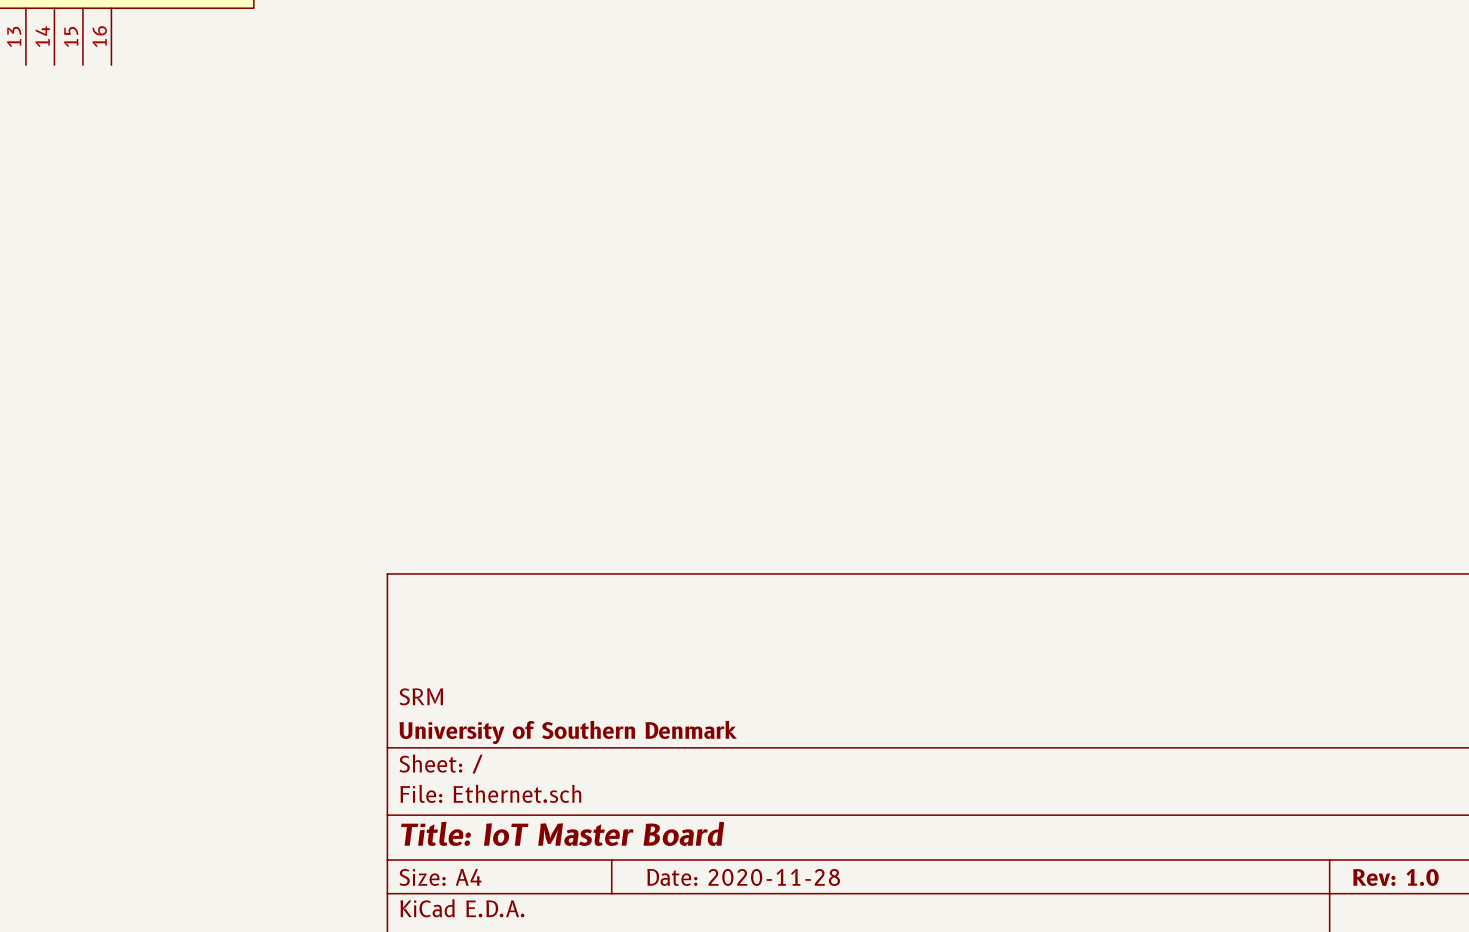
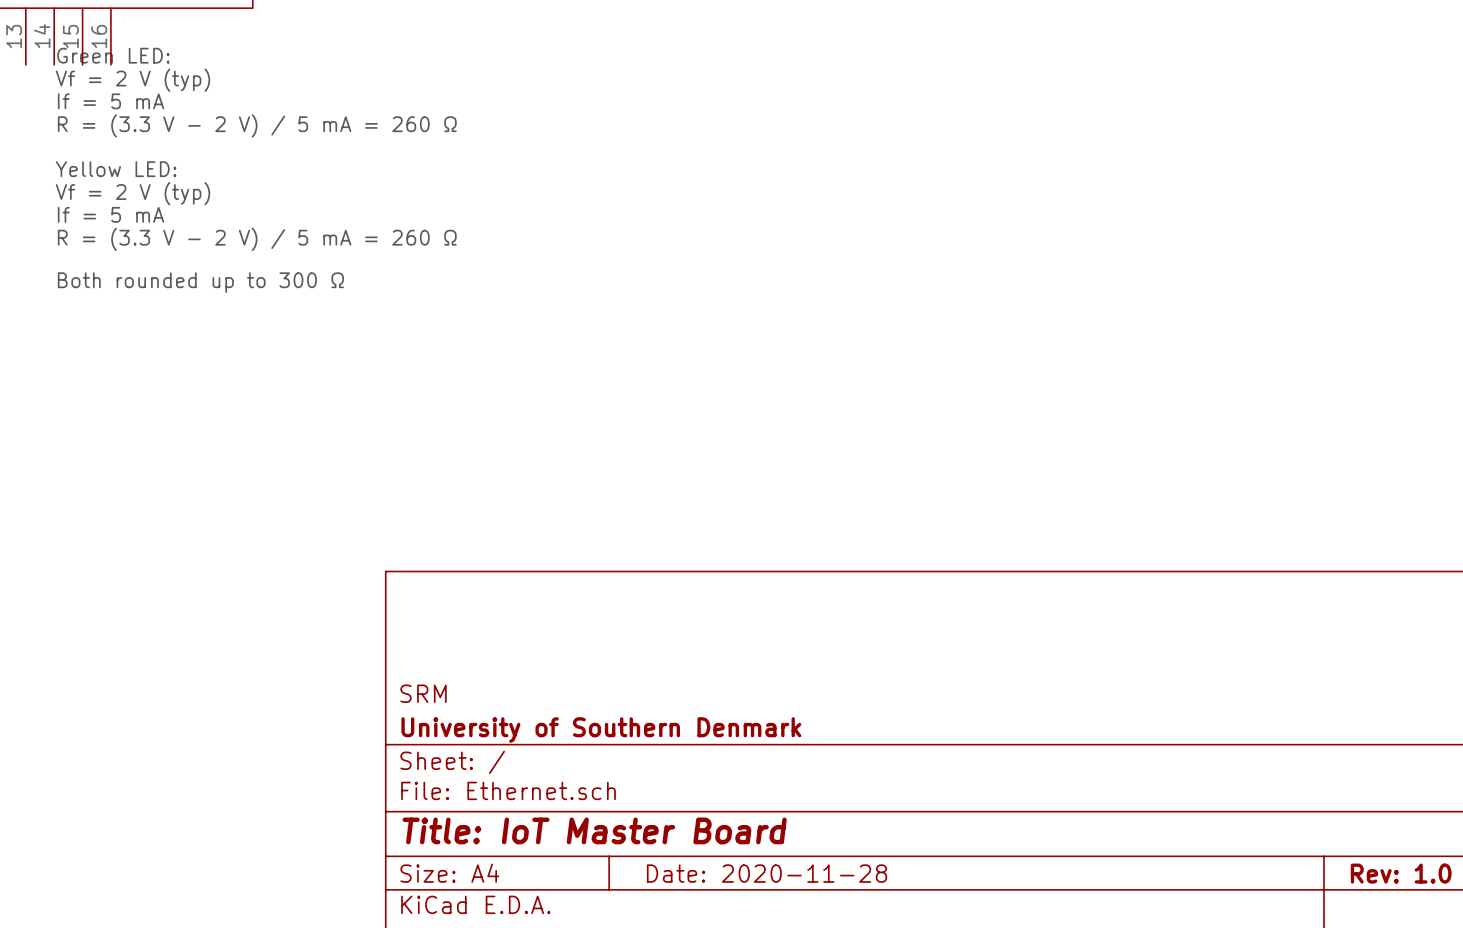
text: none -> Green LED: (113, 55)
text: none -> Vf = 2 V (typ) (132, 80)
text: none -> If = 5 mA (111, 101)
text: none -> R = (3.3 V - 2 V) / 5 mA = 260 Ω (257, 125)
text: none -> Yellow LED: (116, 169)
text: none -> Vf = 2 V (typ) (132, 193)
text: none -> If = 5 mA (111, 214)
text: none -> R = (3.3 V - 2 V) / 5 mA = 260 Ω (257, 239)
text: none -> Both rounded up to 300 Ω (200, 282)

